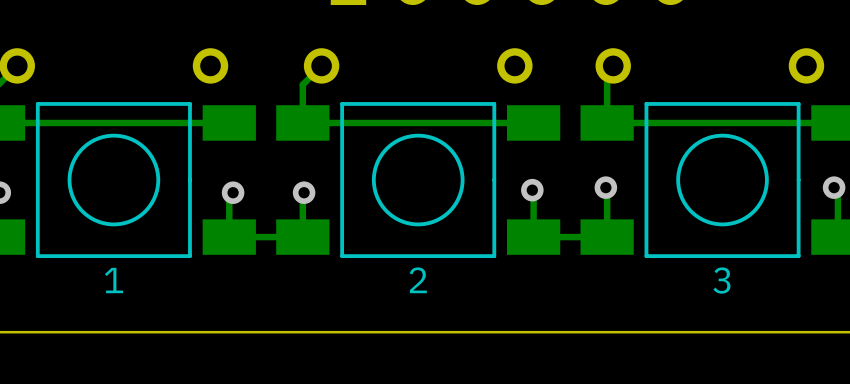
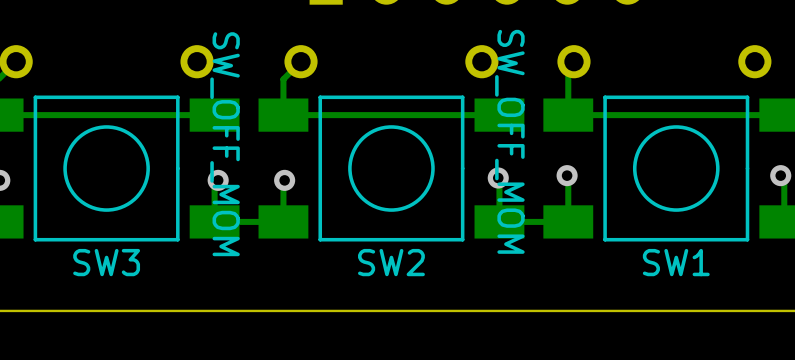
3 value: none -> SW_OFF_MOM (509, 141)
2 value: none -> SW_OFF_MOM (225, 144)
1 name: 1 (114, 280) -> SW3 (106, 262)
2 name: 2 (418, 280) -> SW2 (391, 262)
3 name: 3 (721, 280) -> SW1 (676, 262)

